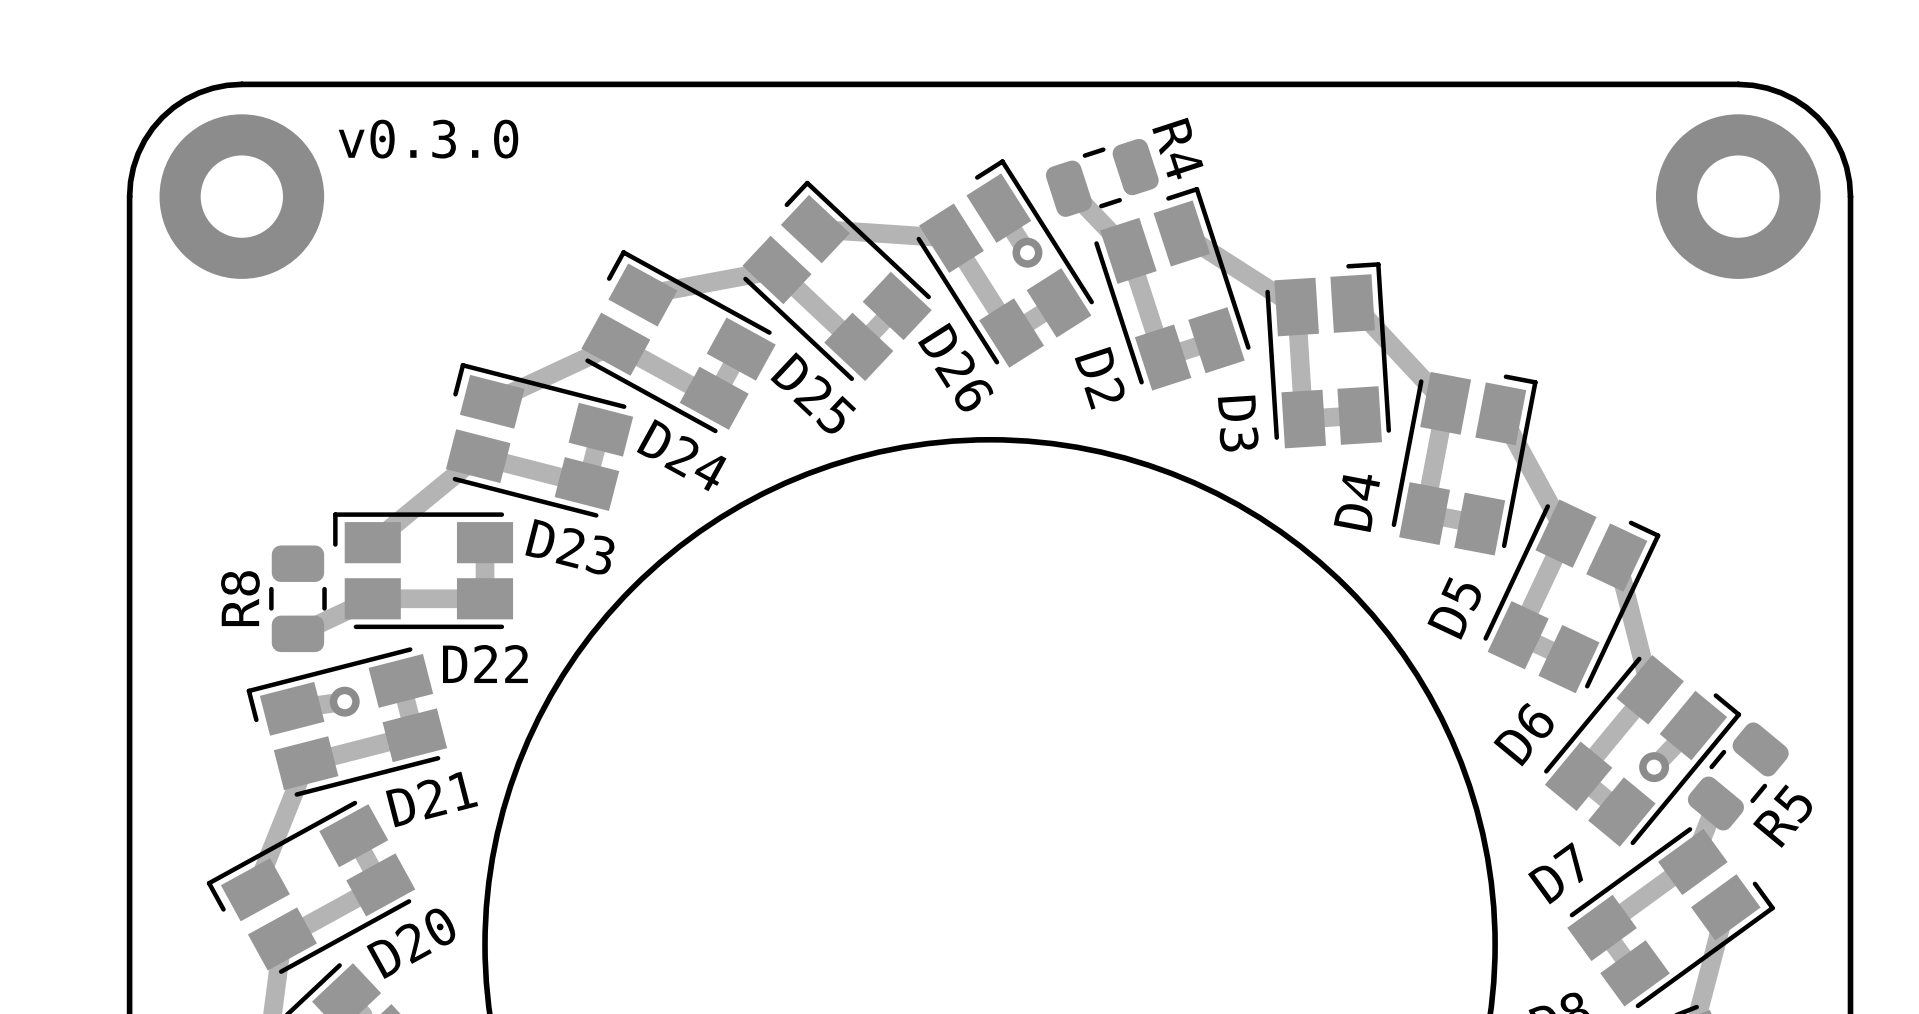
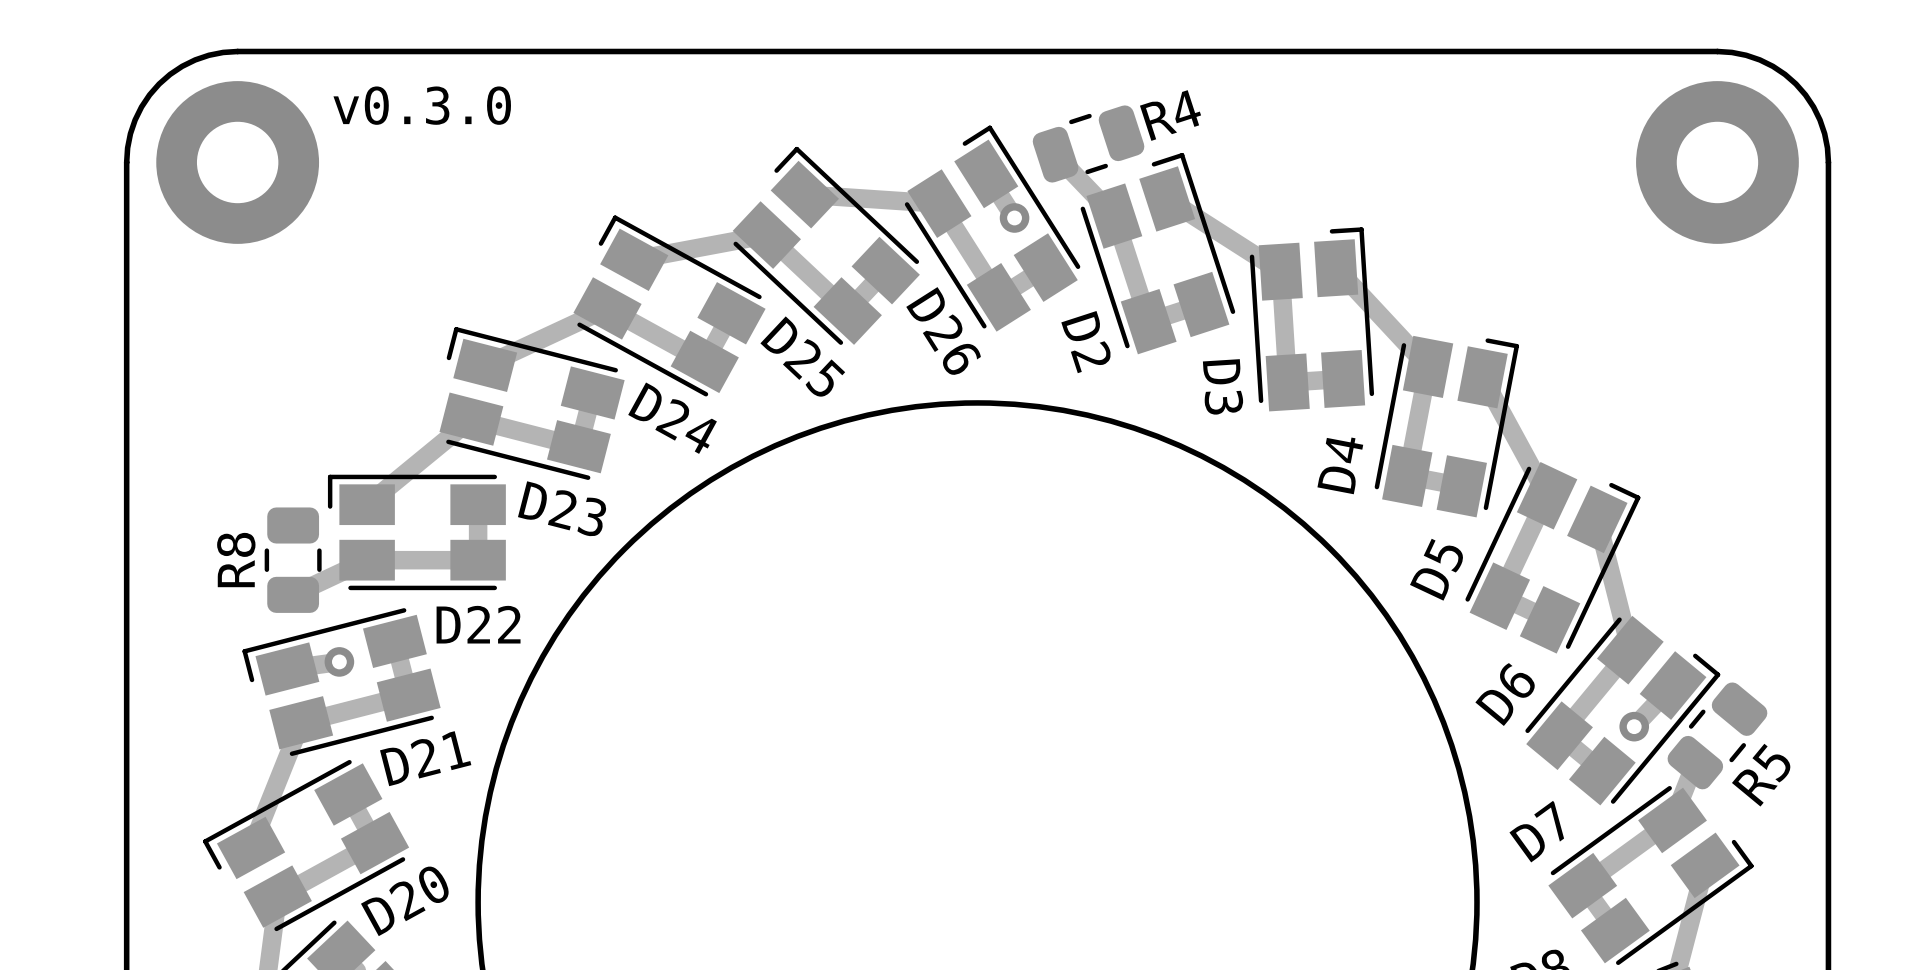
R4 name rotation: 0° (1177, 148) -> 90° counterclockwise (1170, 115)

